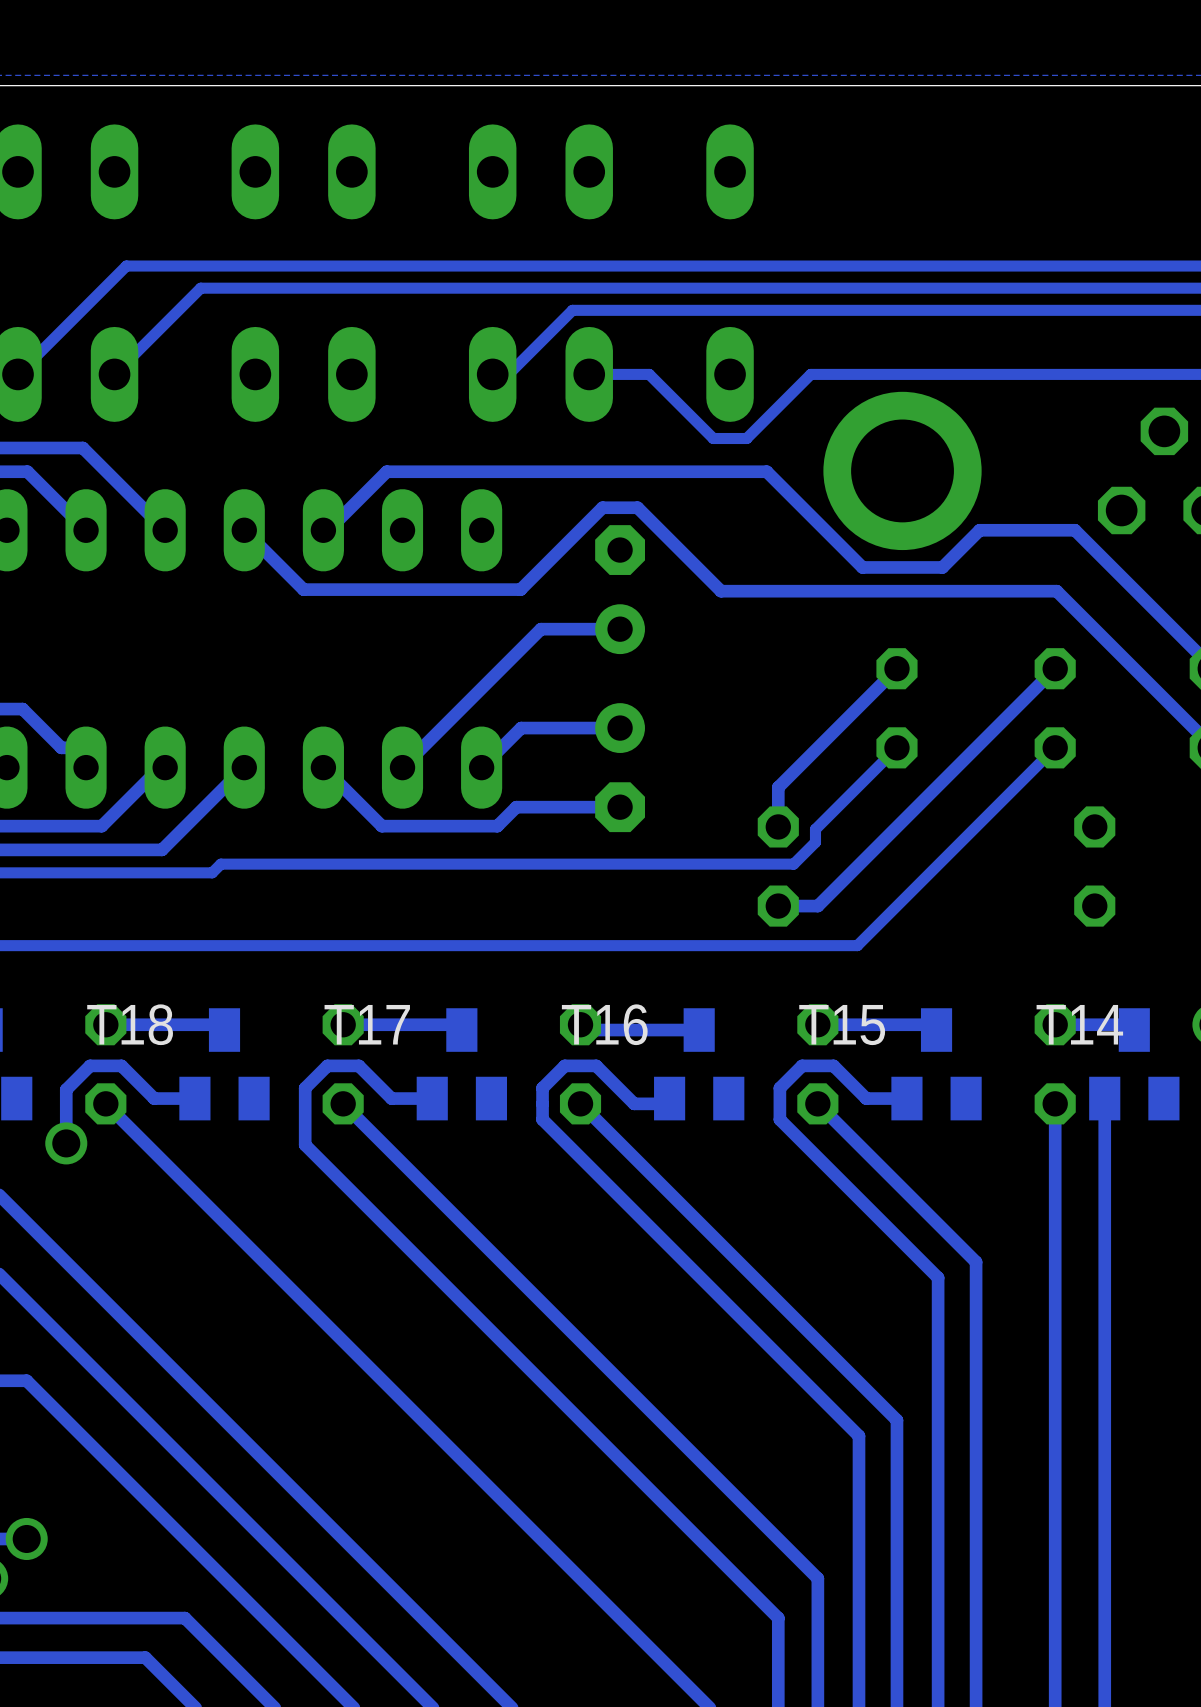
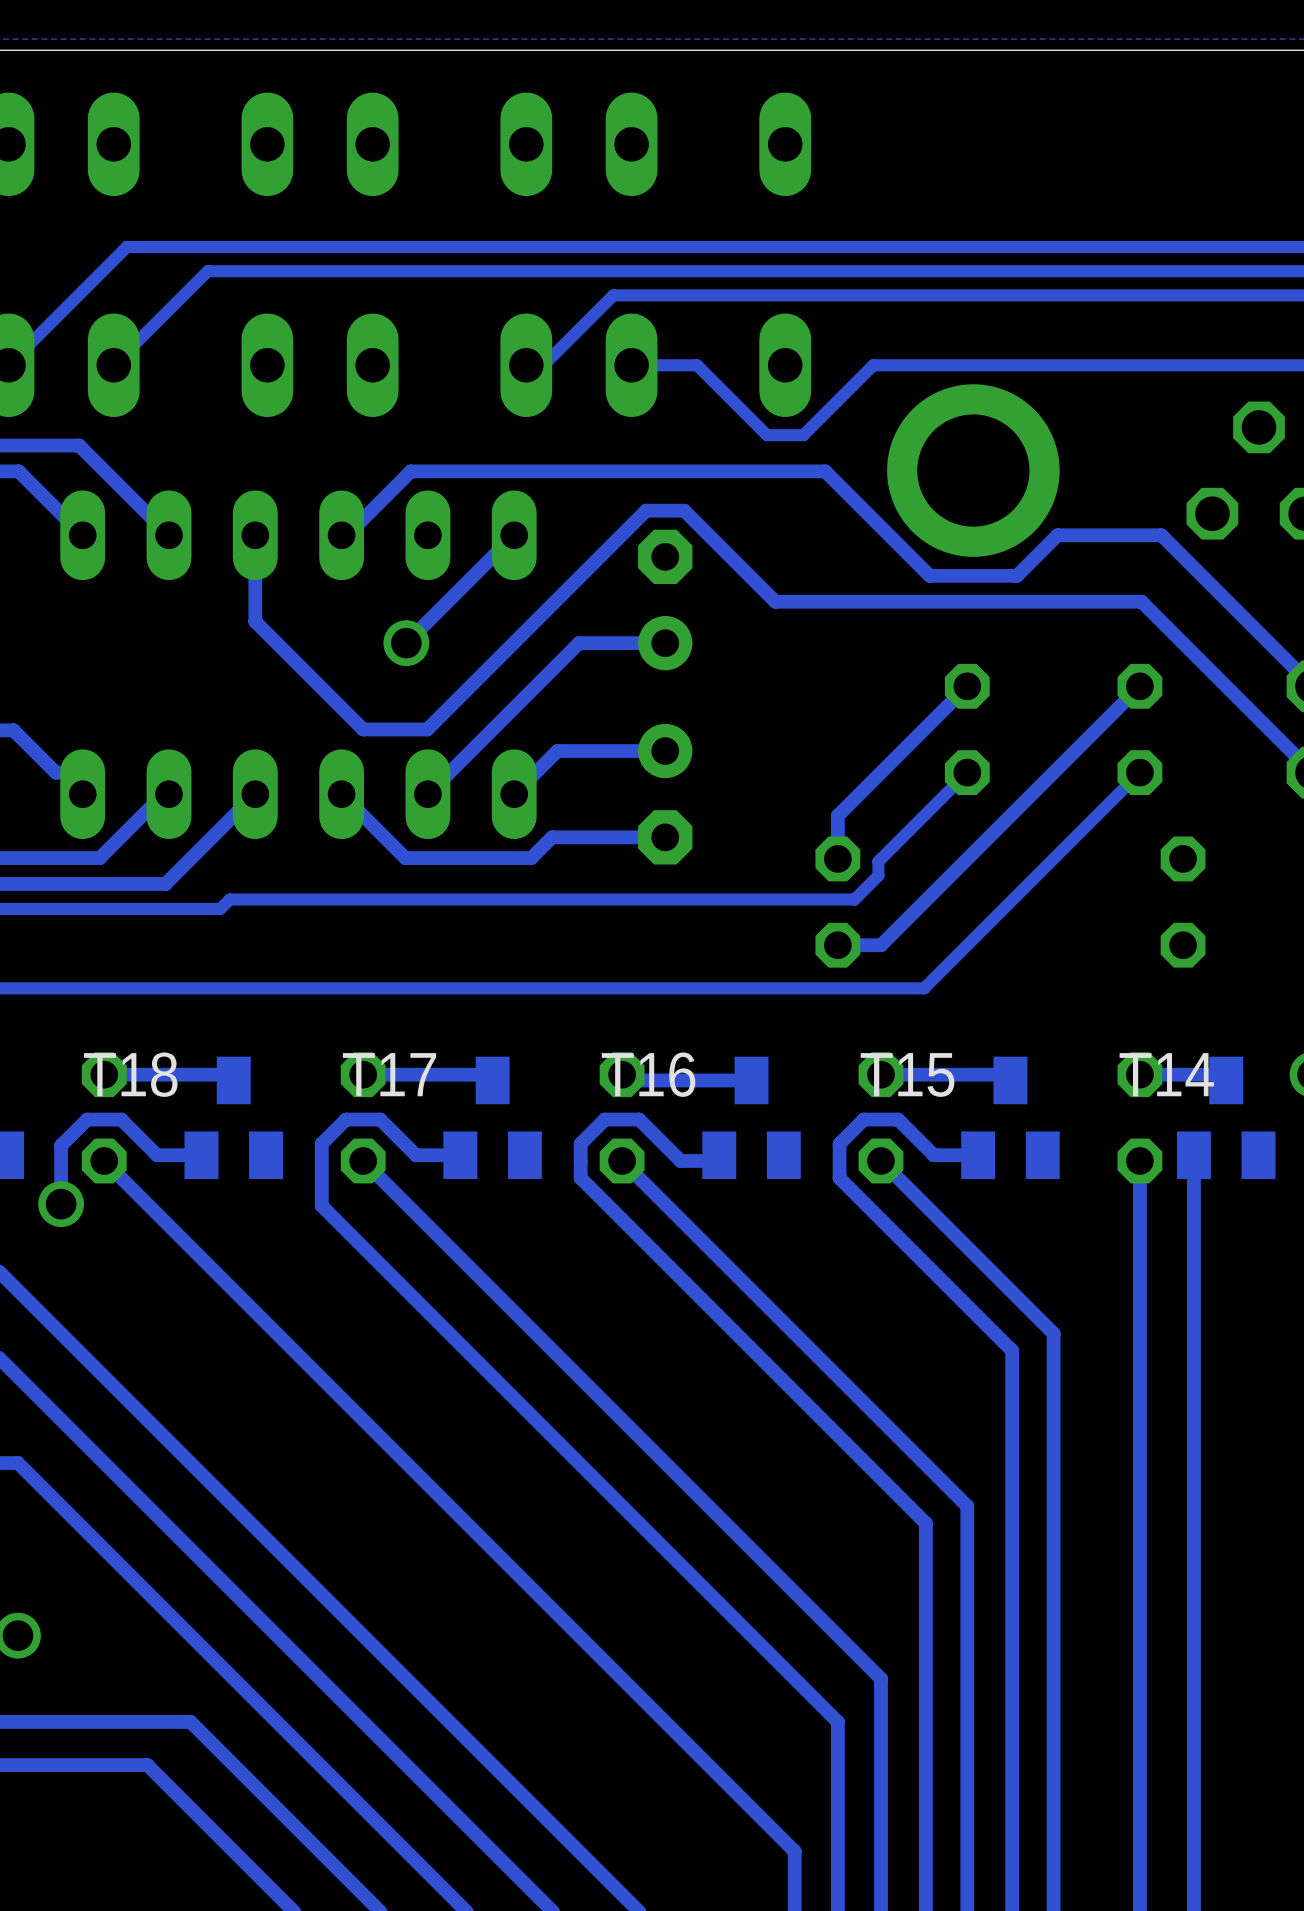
track: (244, 530) (303, 589) (520, 589) -> (255, 535) (255, 621) (363, 729) (427, 729) (556, 600)
track: none -> (514, 535) (406, 643)
via: none -> (406, 643)

